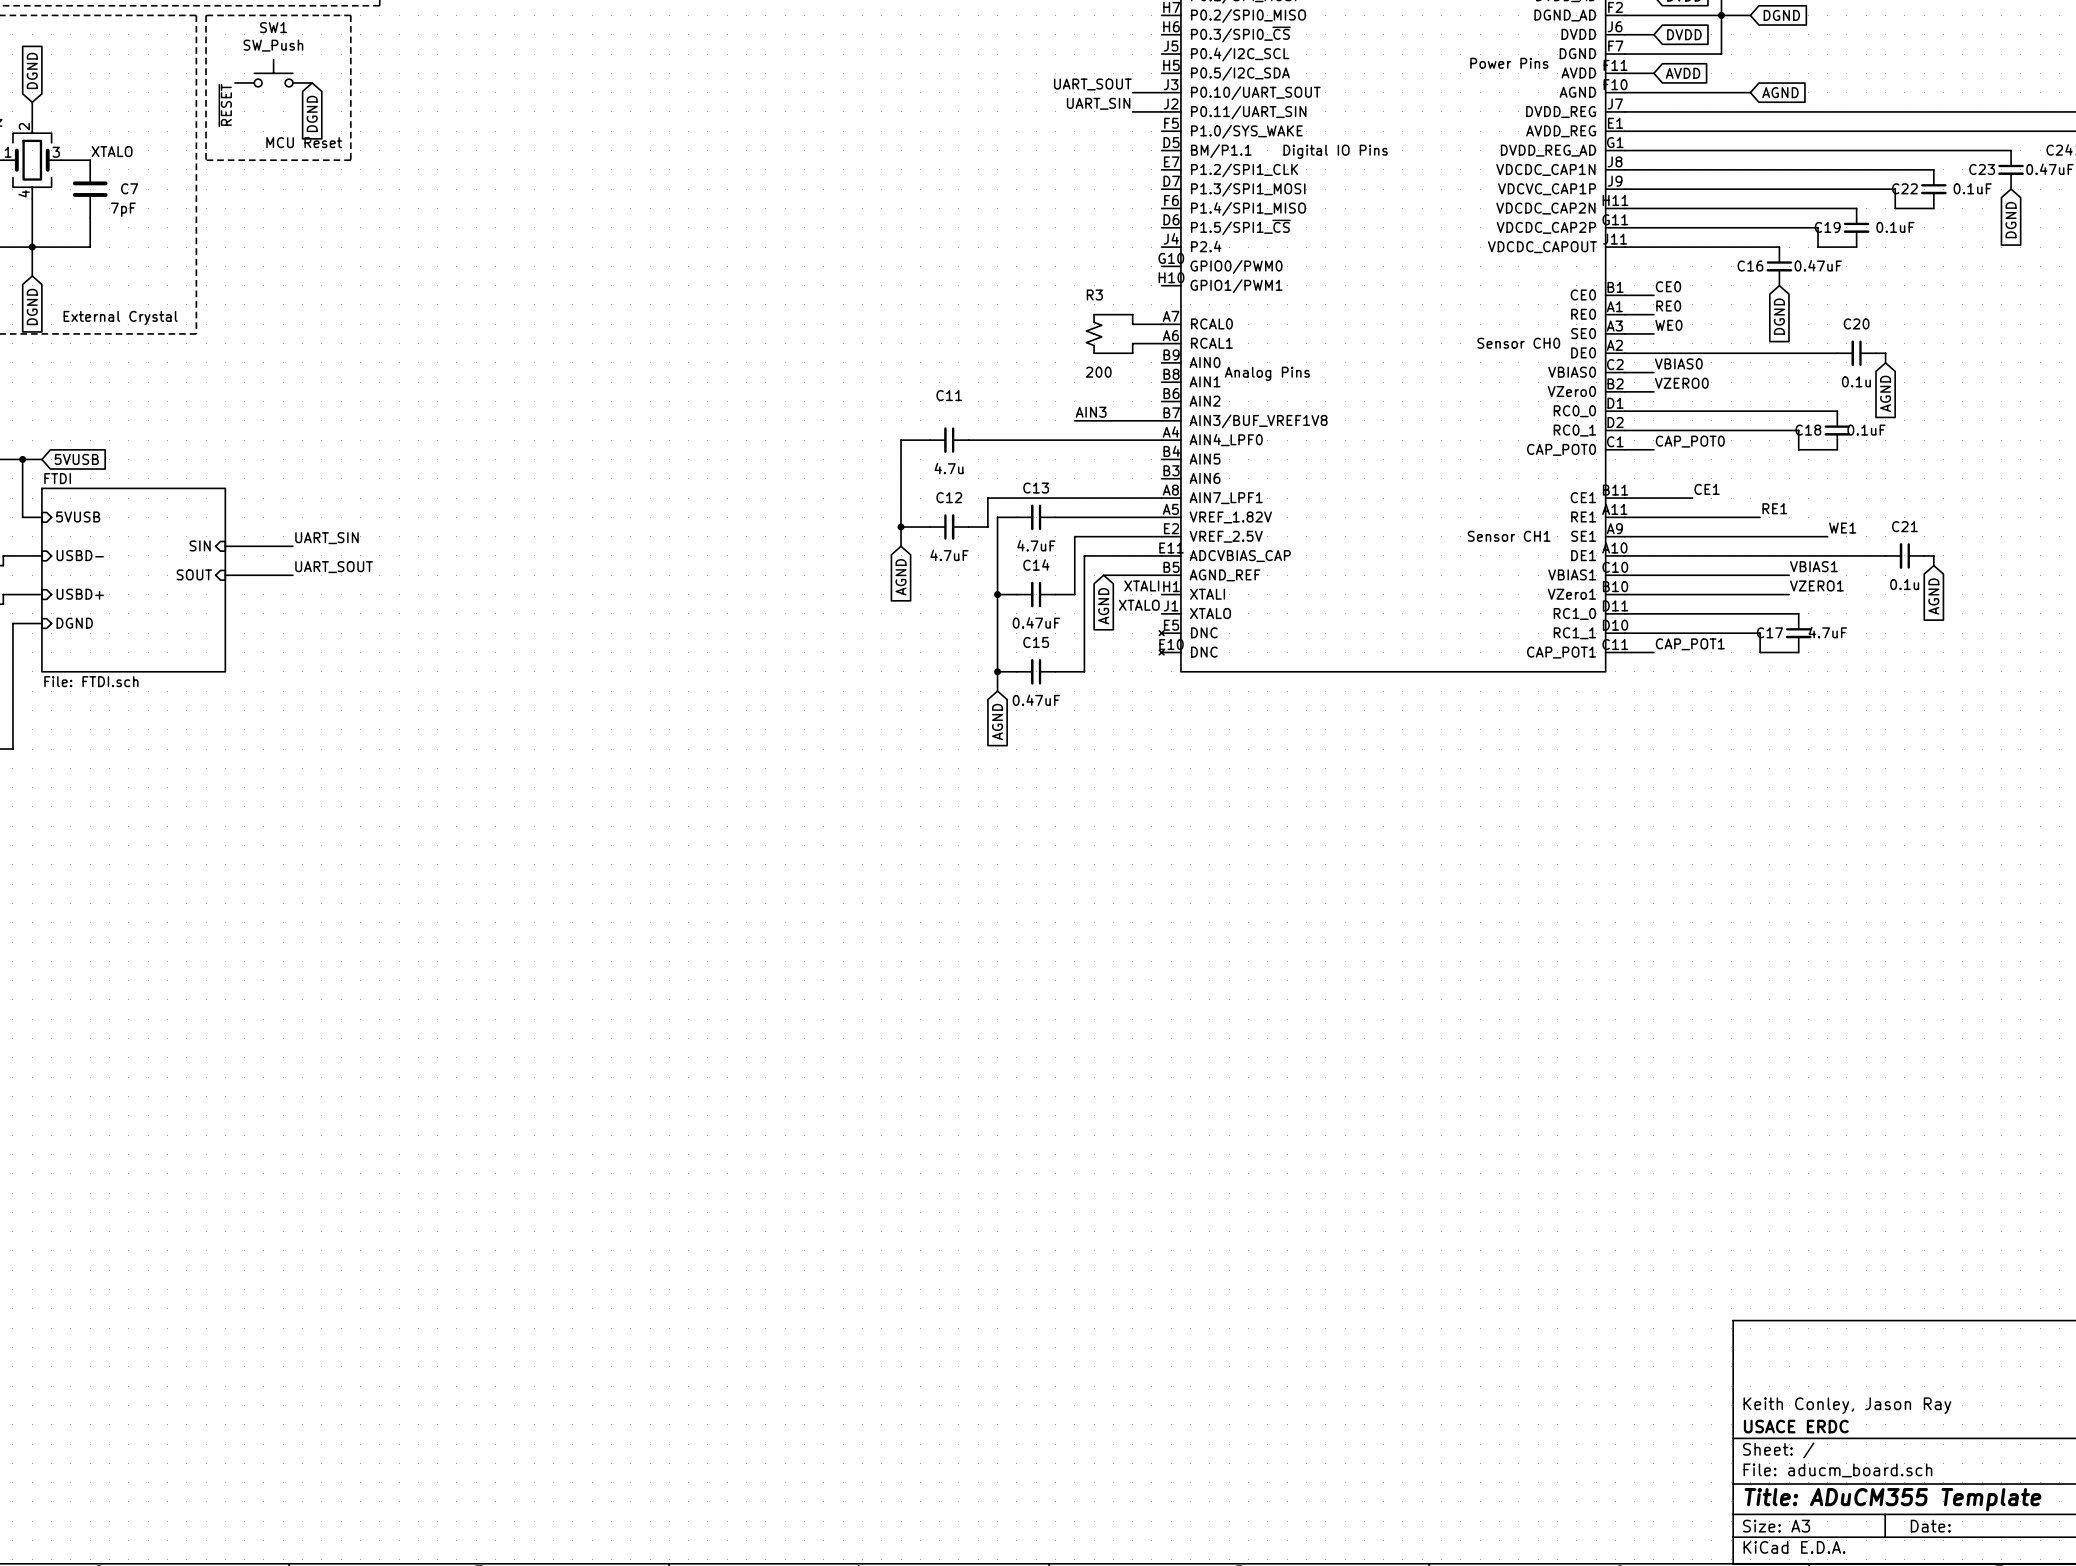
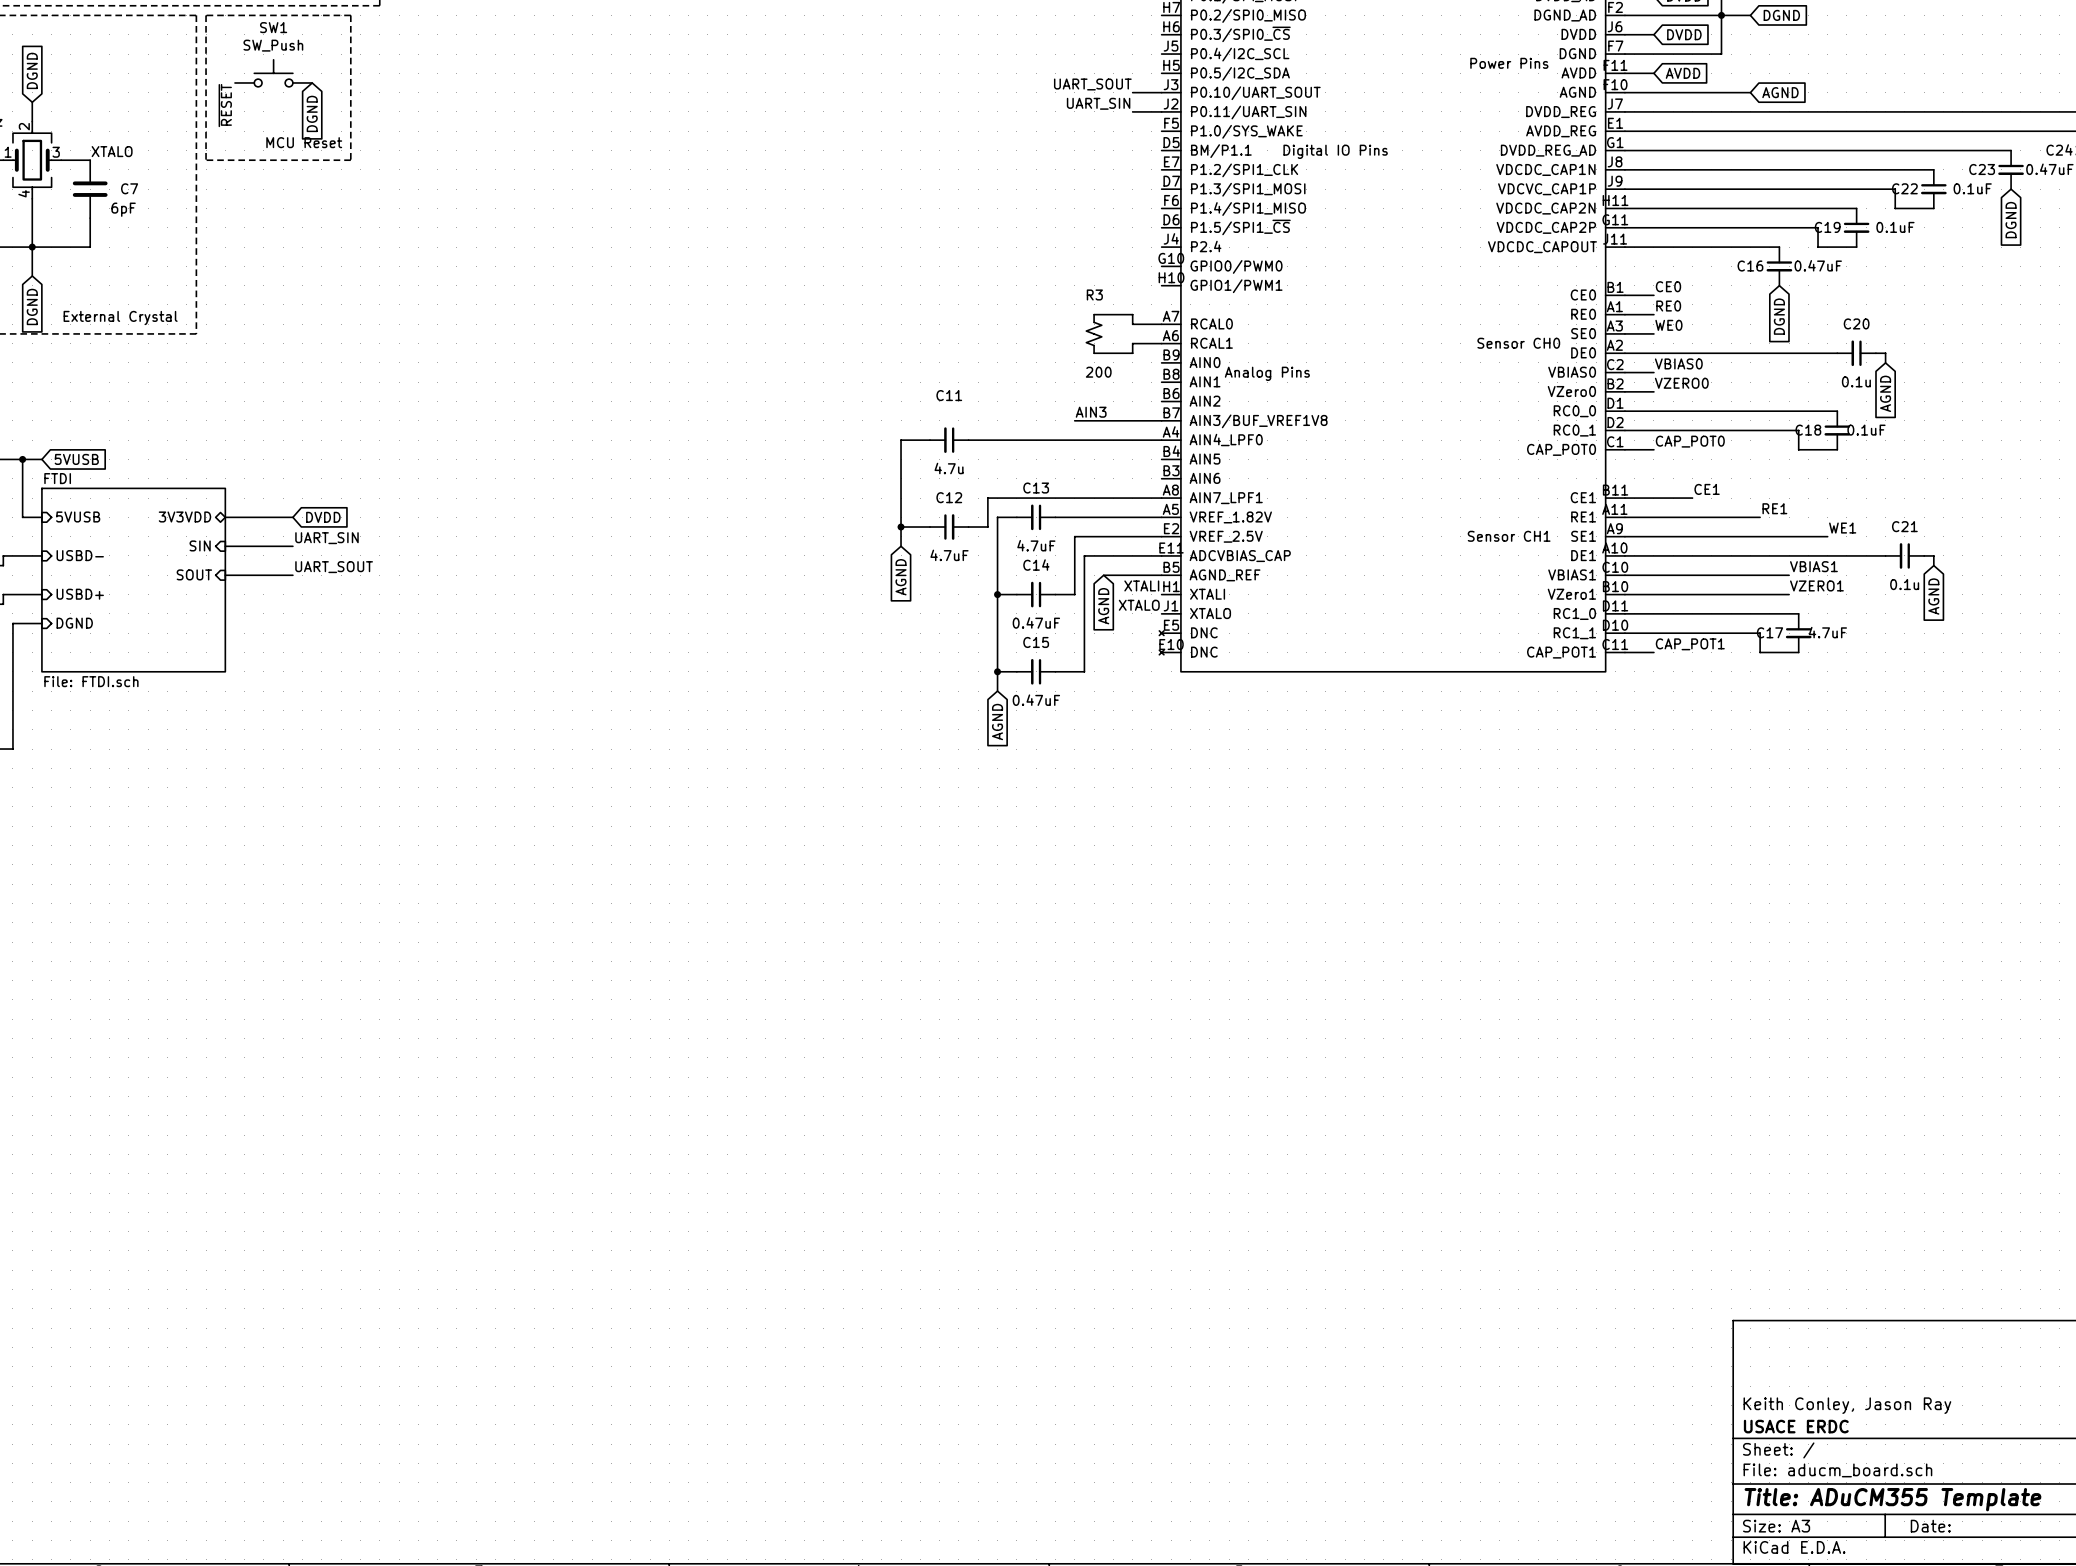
C7 value: 7pF (123, 209) -> 6pF (123, 209)
sheet pin: none -> 3V3VDD (184, 516)
wire: none -> (225, 517) (292, 517)
global label: none -> DVDD (323, 517)

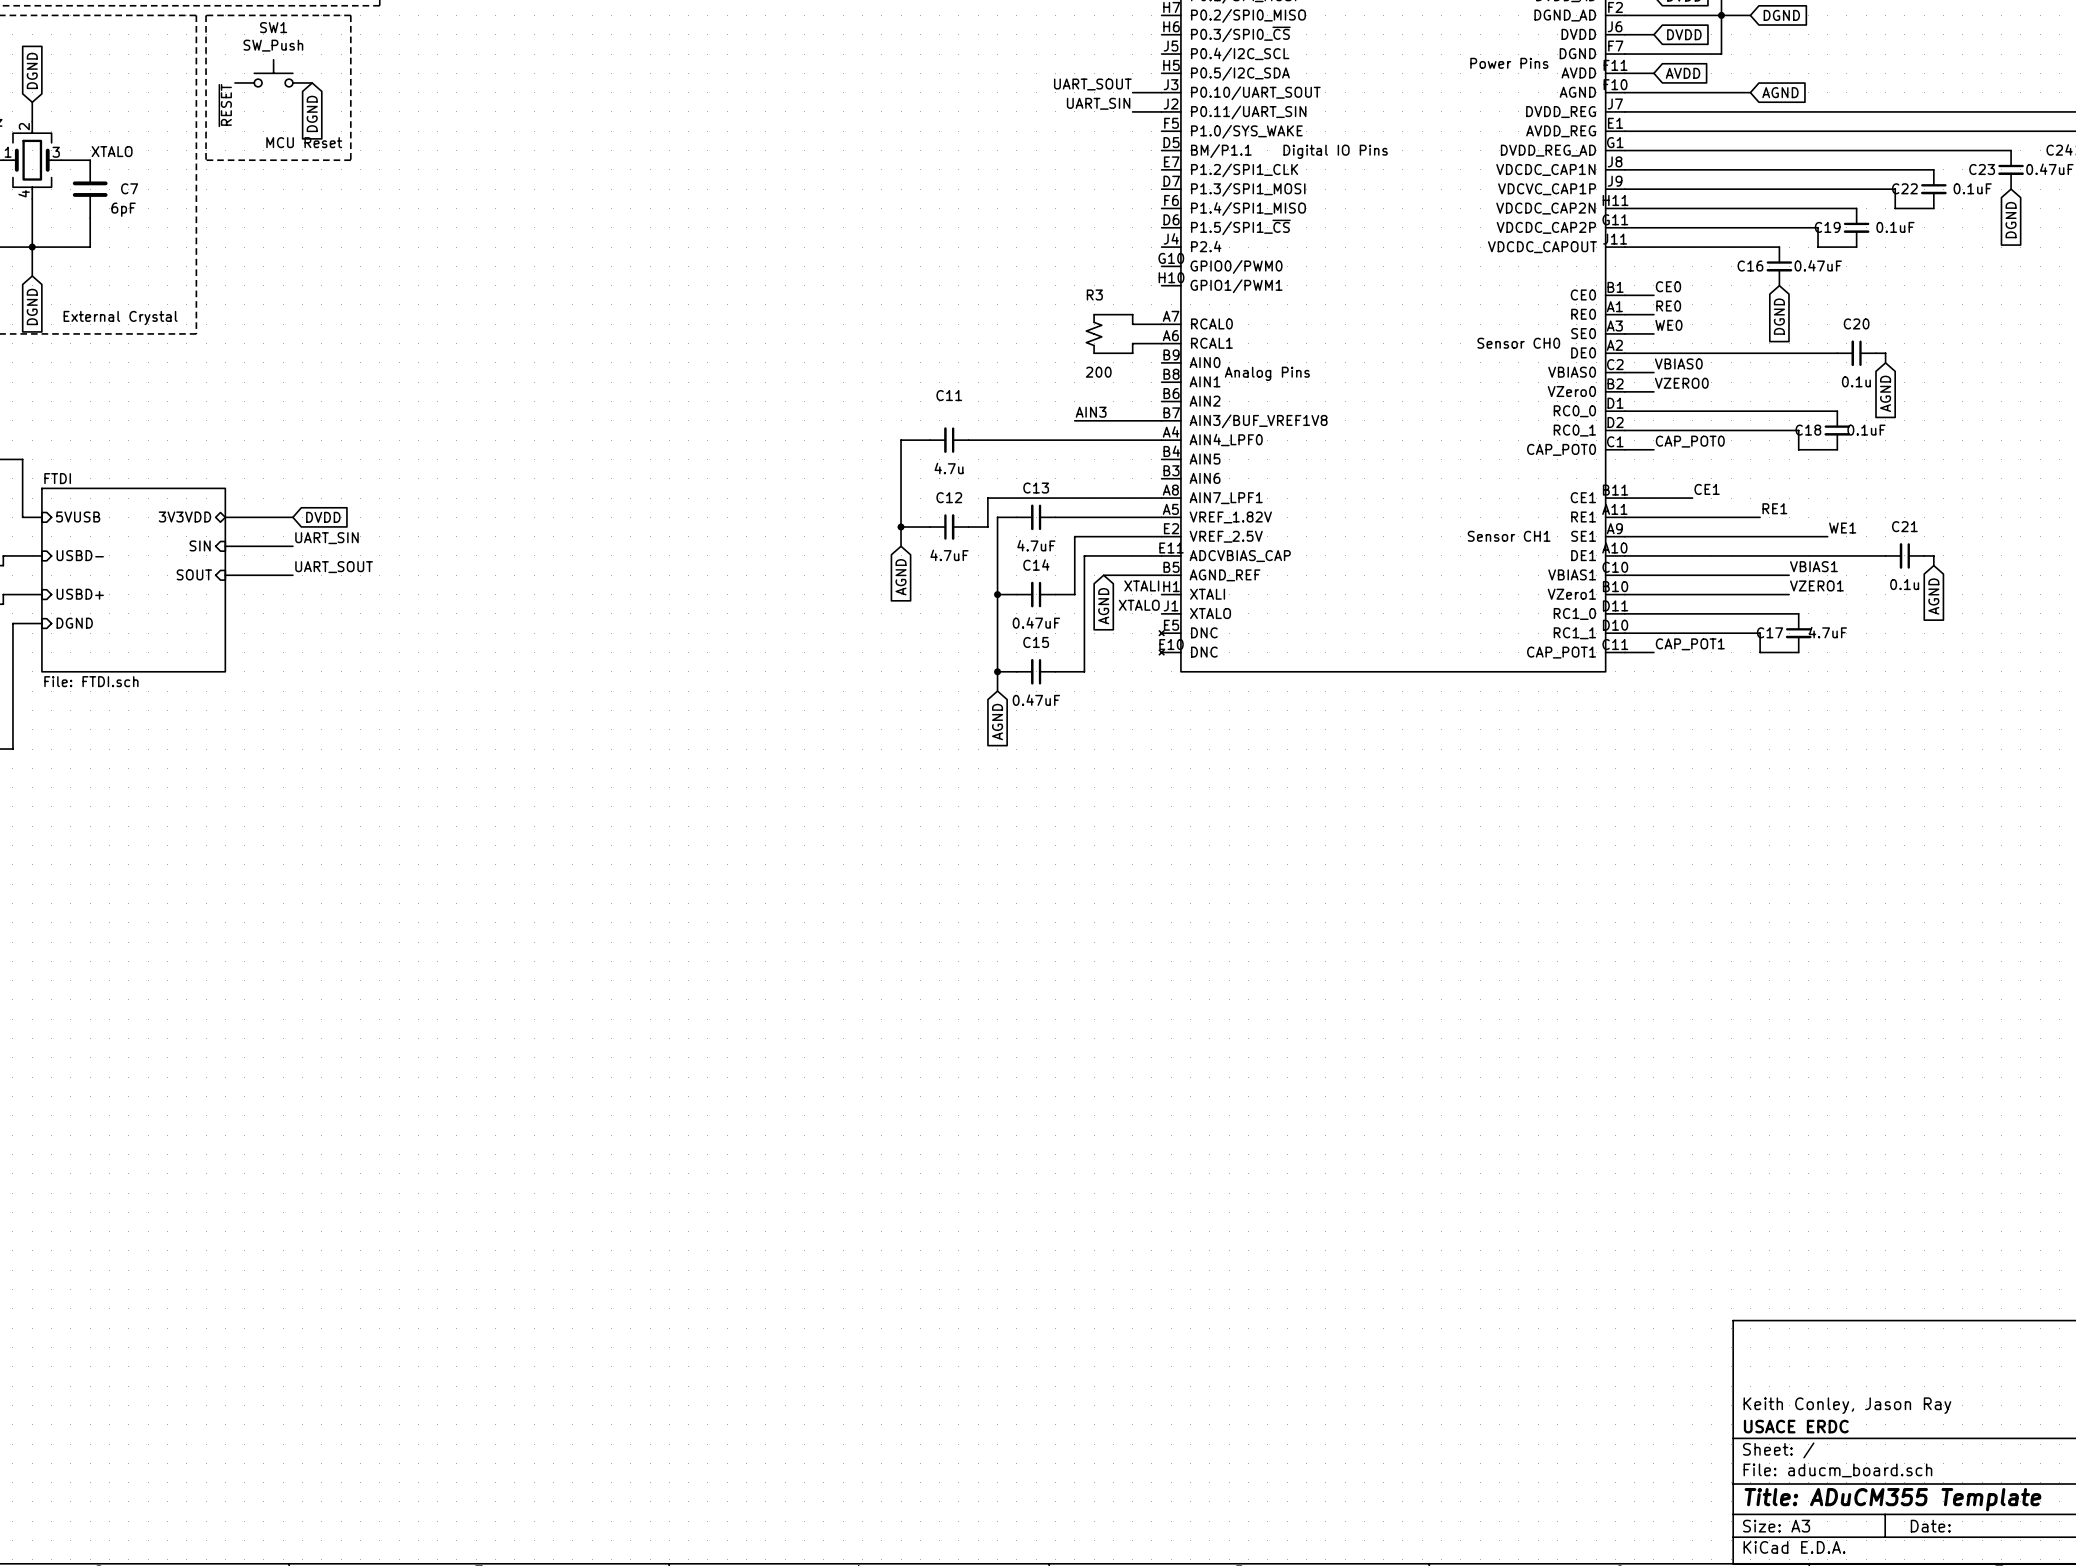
wire: (22, 459) (41, 459) -> none
junction: (22, 459) -> none
global label: 5VUSB (76, 459) -> none

